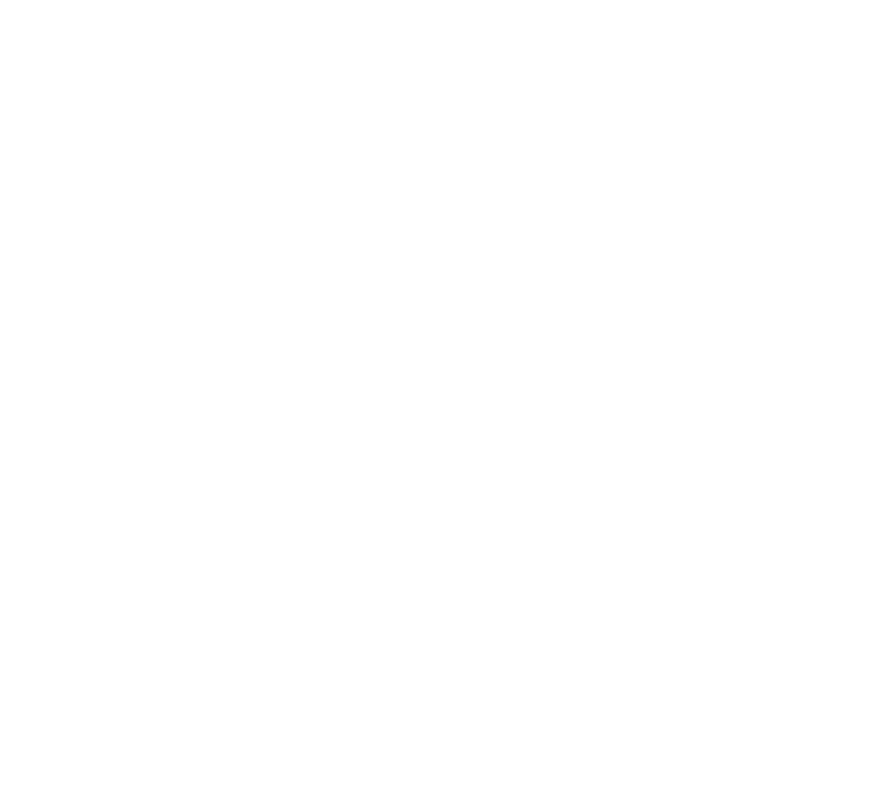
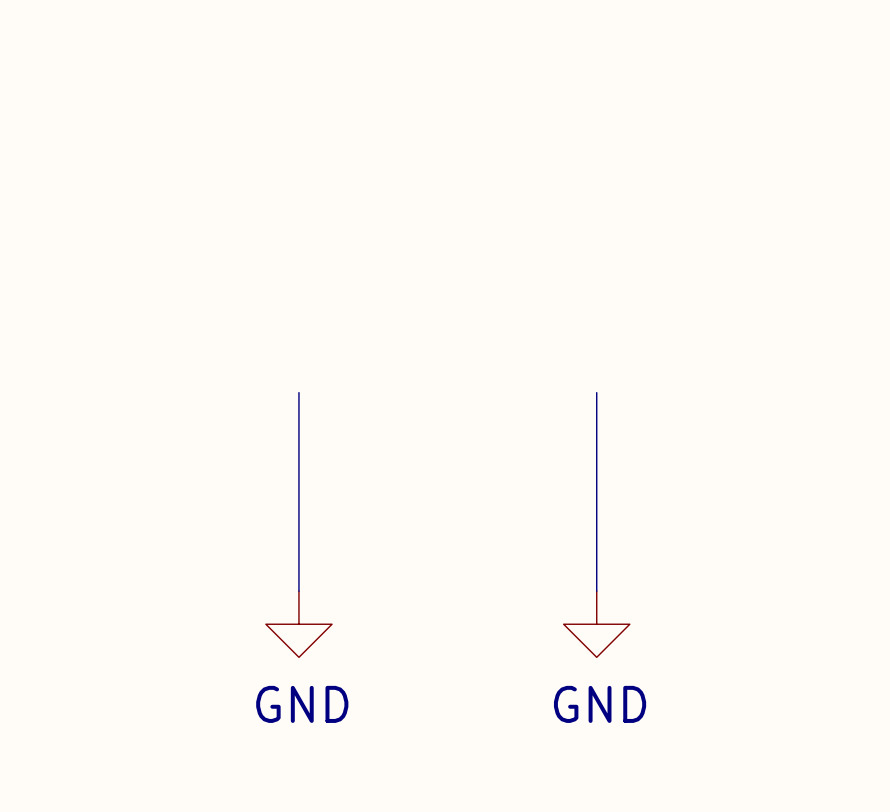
wire: none -> (298, 392) (298, 591)
wire: none -> (596, 392) (596, 591)
power symbol: none -> GND (298, 624)
power symbol: none -> GND (596, 624)

